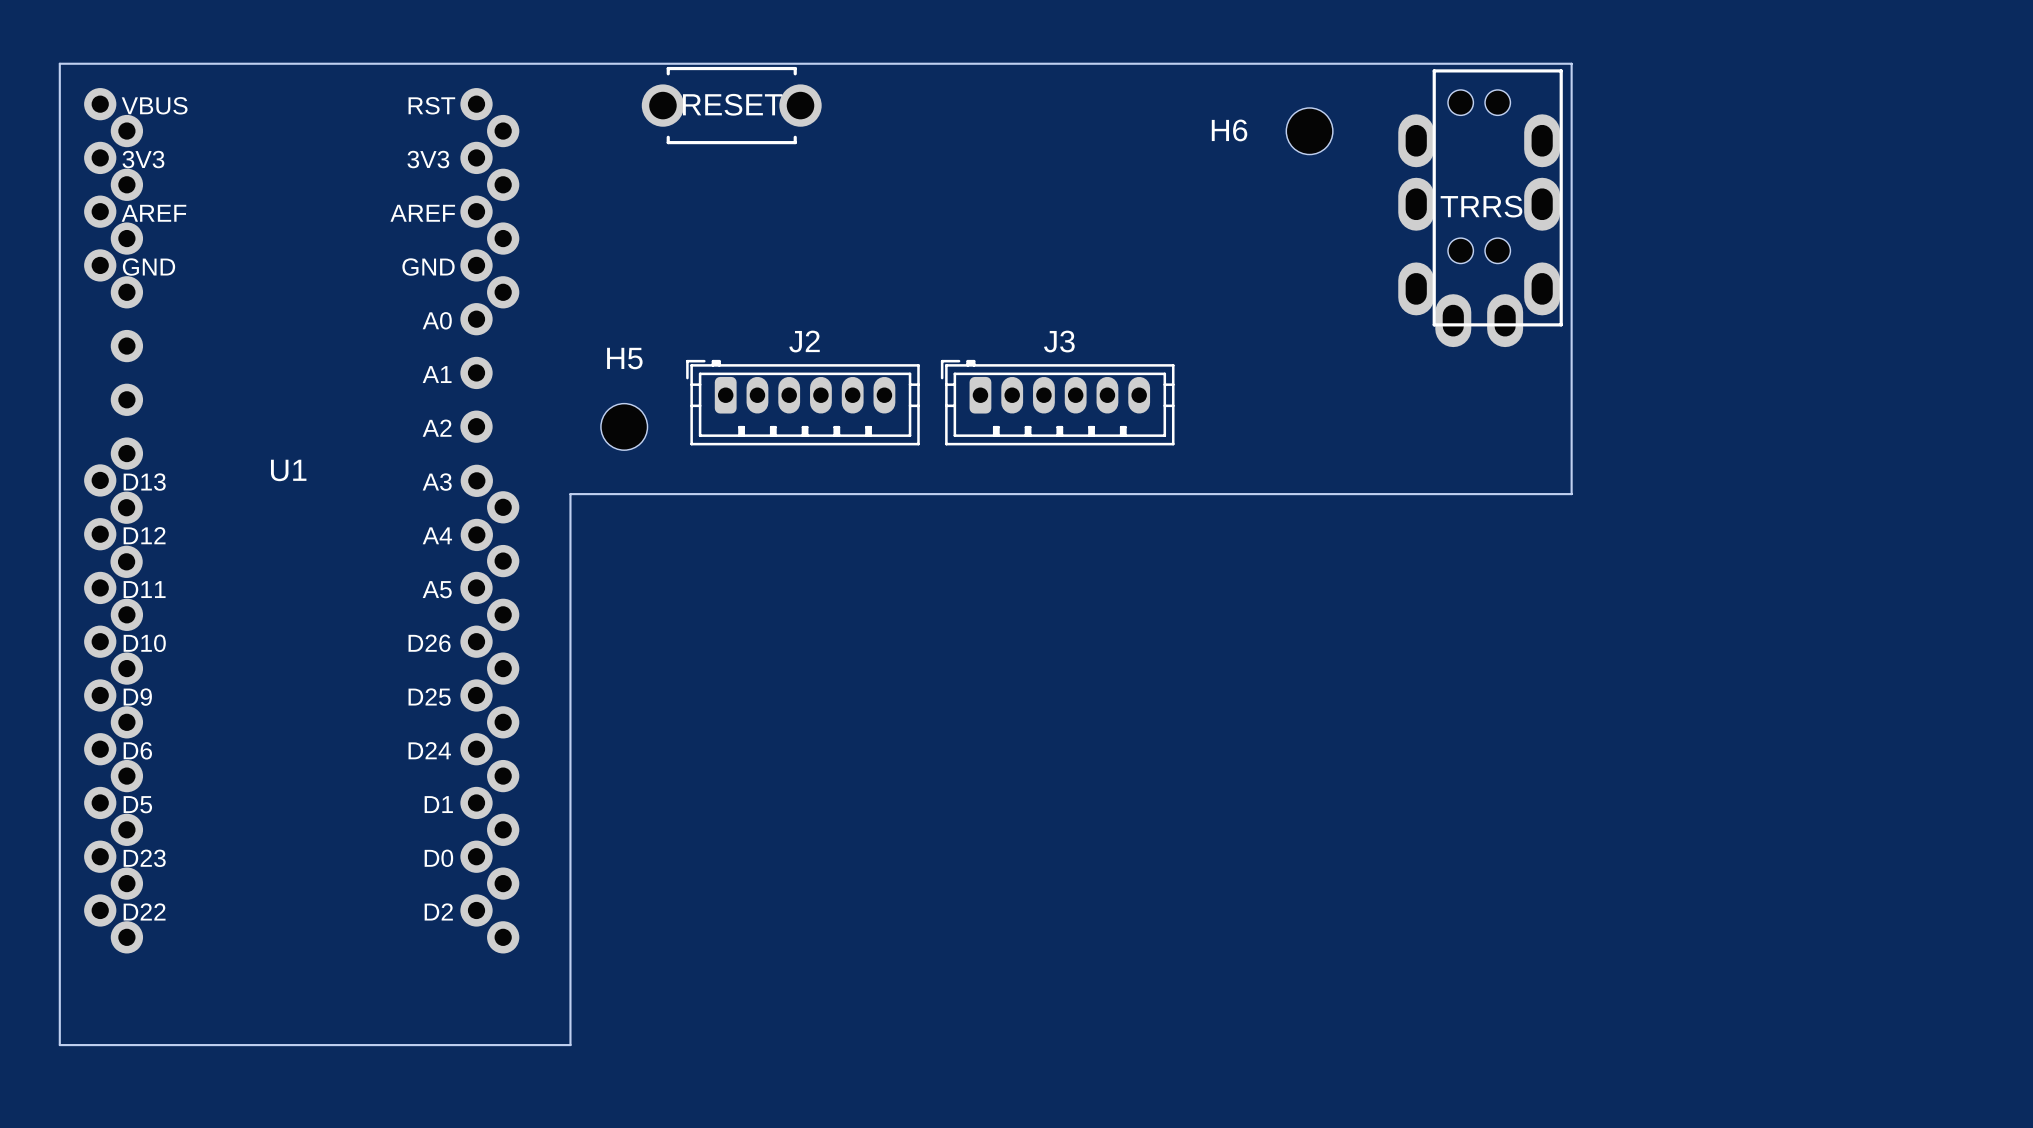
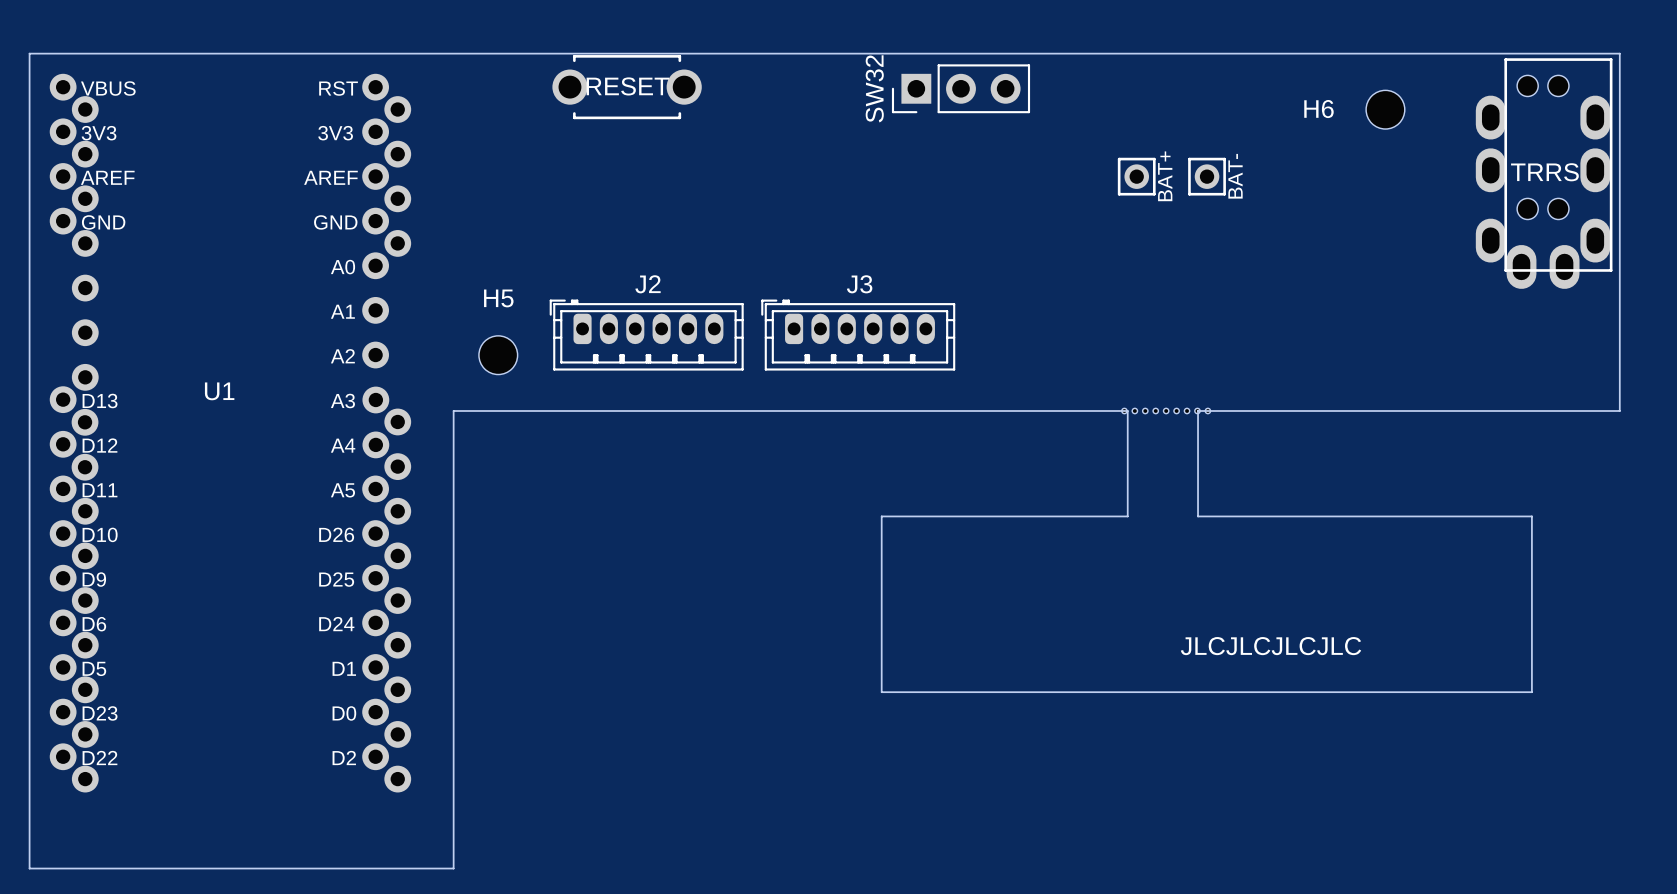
board edge: (1571, 63) (1571, 494) -> (1285, 53) (1619, 53) (1619, 411) (1285, 411)
part position: (731, 105) -> (627, 87)
SW32: none -> (960, 88)
H6 position: (1309, 131) -> (1385, 109)
part position: (1480, 208) -> (1544, 173)
BAT+: none -> (1136, 176)
BAT-: none -> (1207, 176)
board edge: (1382, 494) (1466, 494) -> (1127, 411) (1127, 516) (881, 516) (881, 692) (1531, 692) (1531, 516) (1198, 516) (1198, 411)
part: none -> (1166, 411)
text: none -> JLCJLCJLCJLC (1271, 646)

